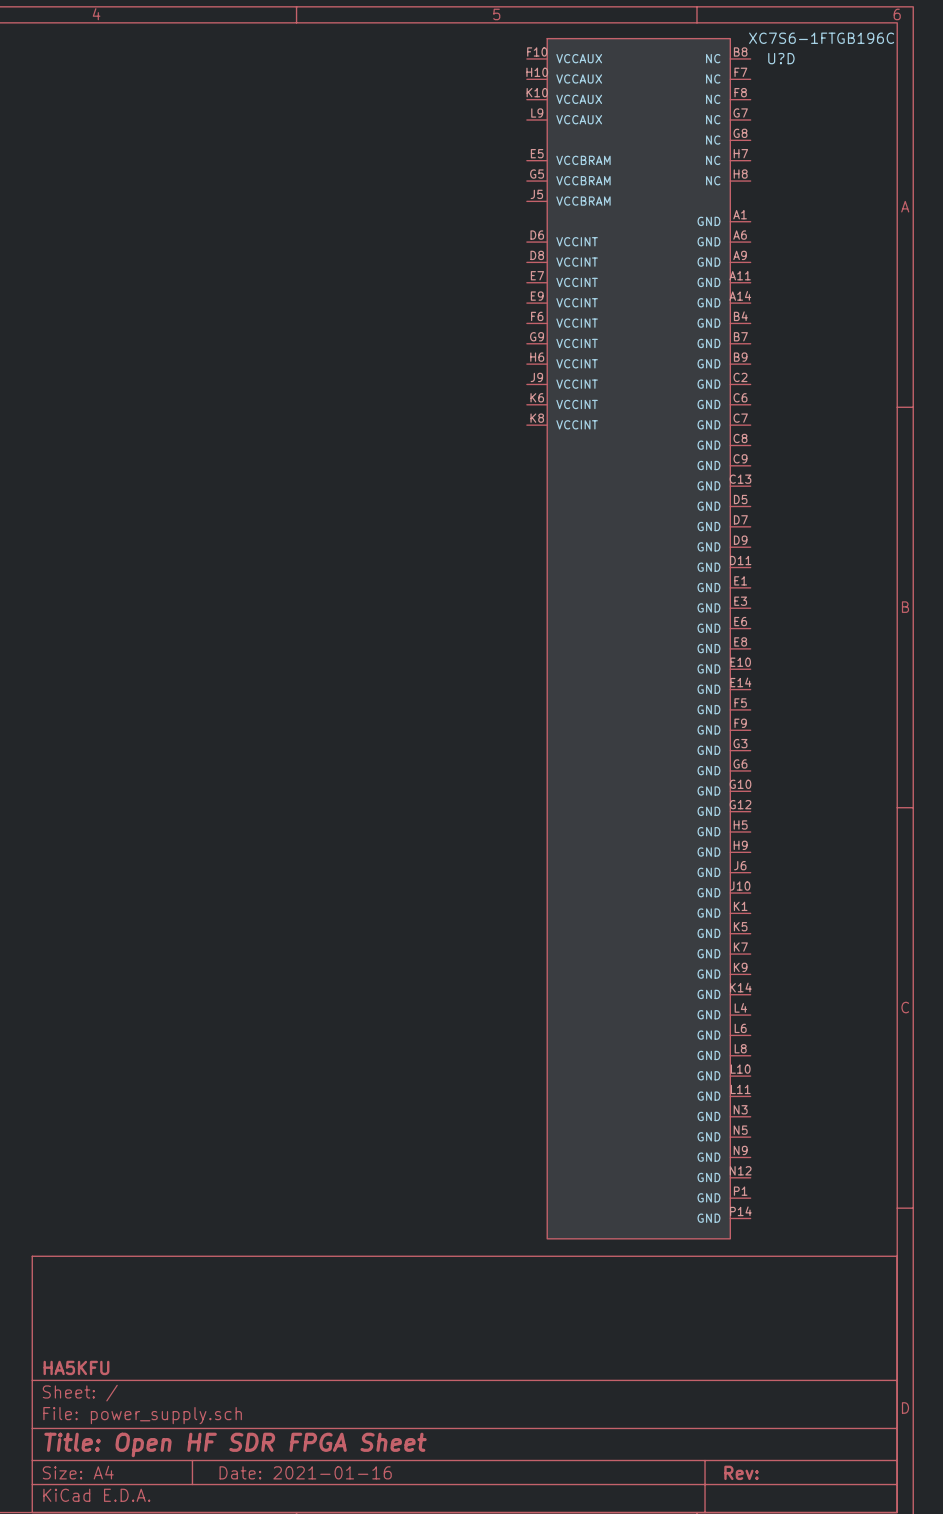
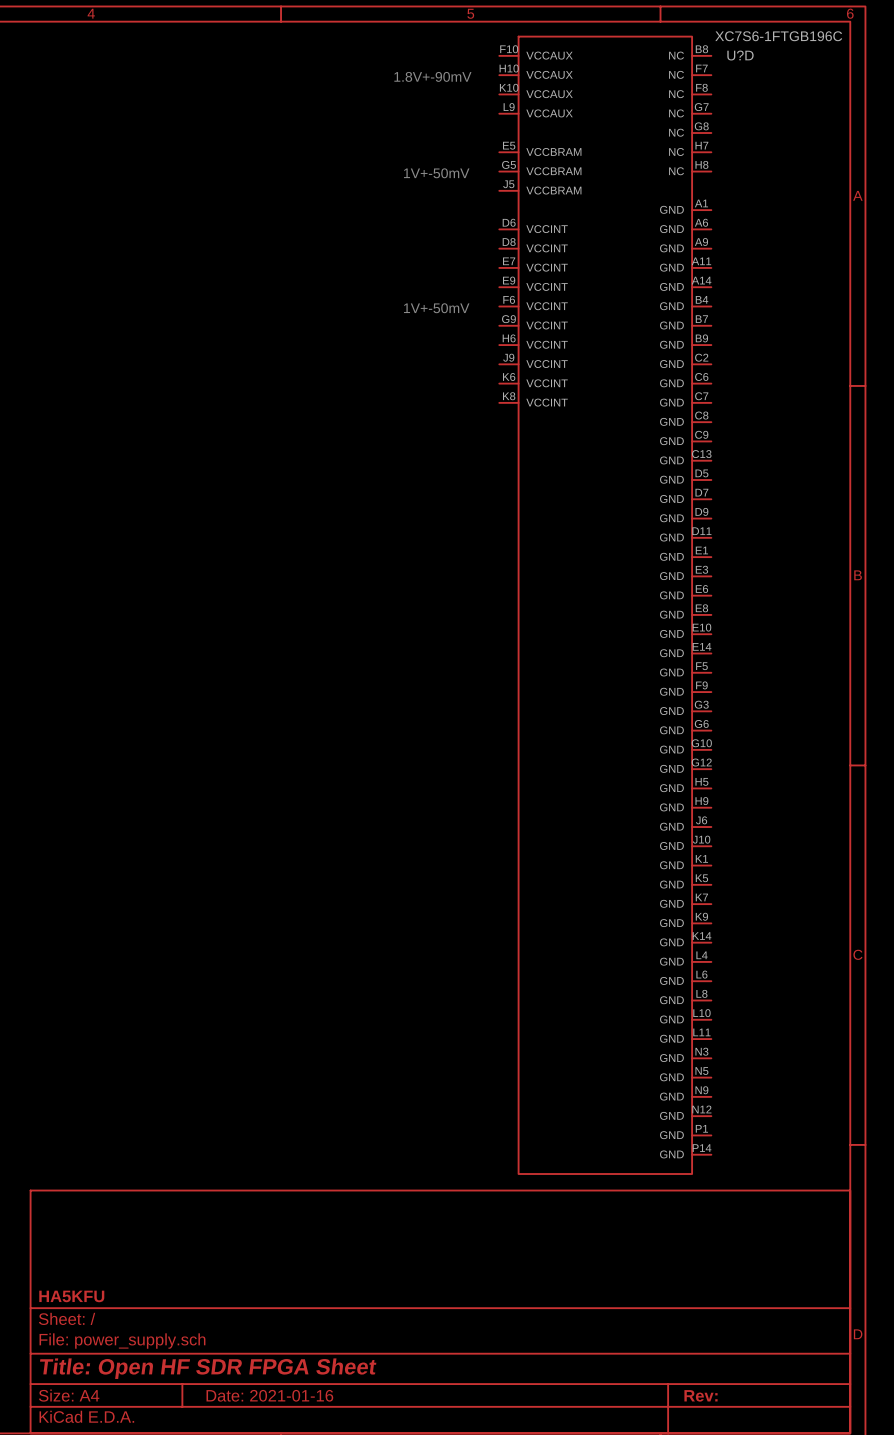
text: none -> 1.8V+-90mV (432, 76)
text: none -> 1V+-50mV (436, 173)
text: none -> 1V+-50mV (436, 308)

